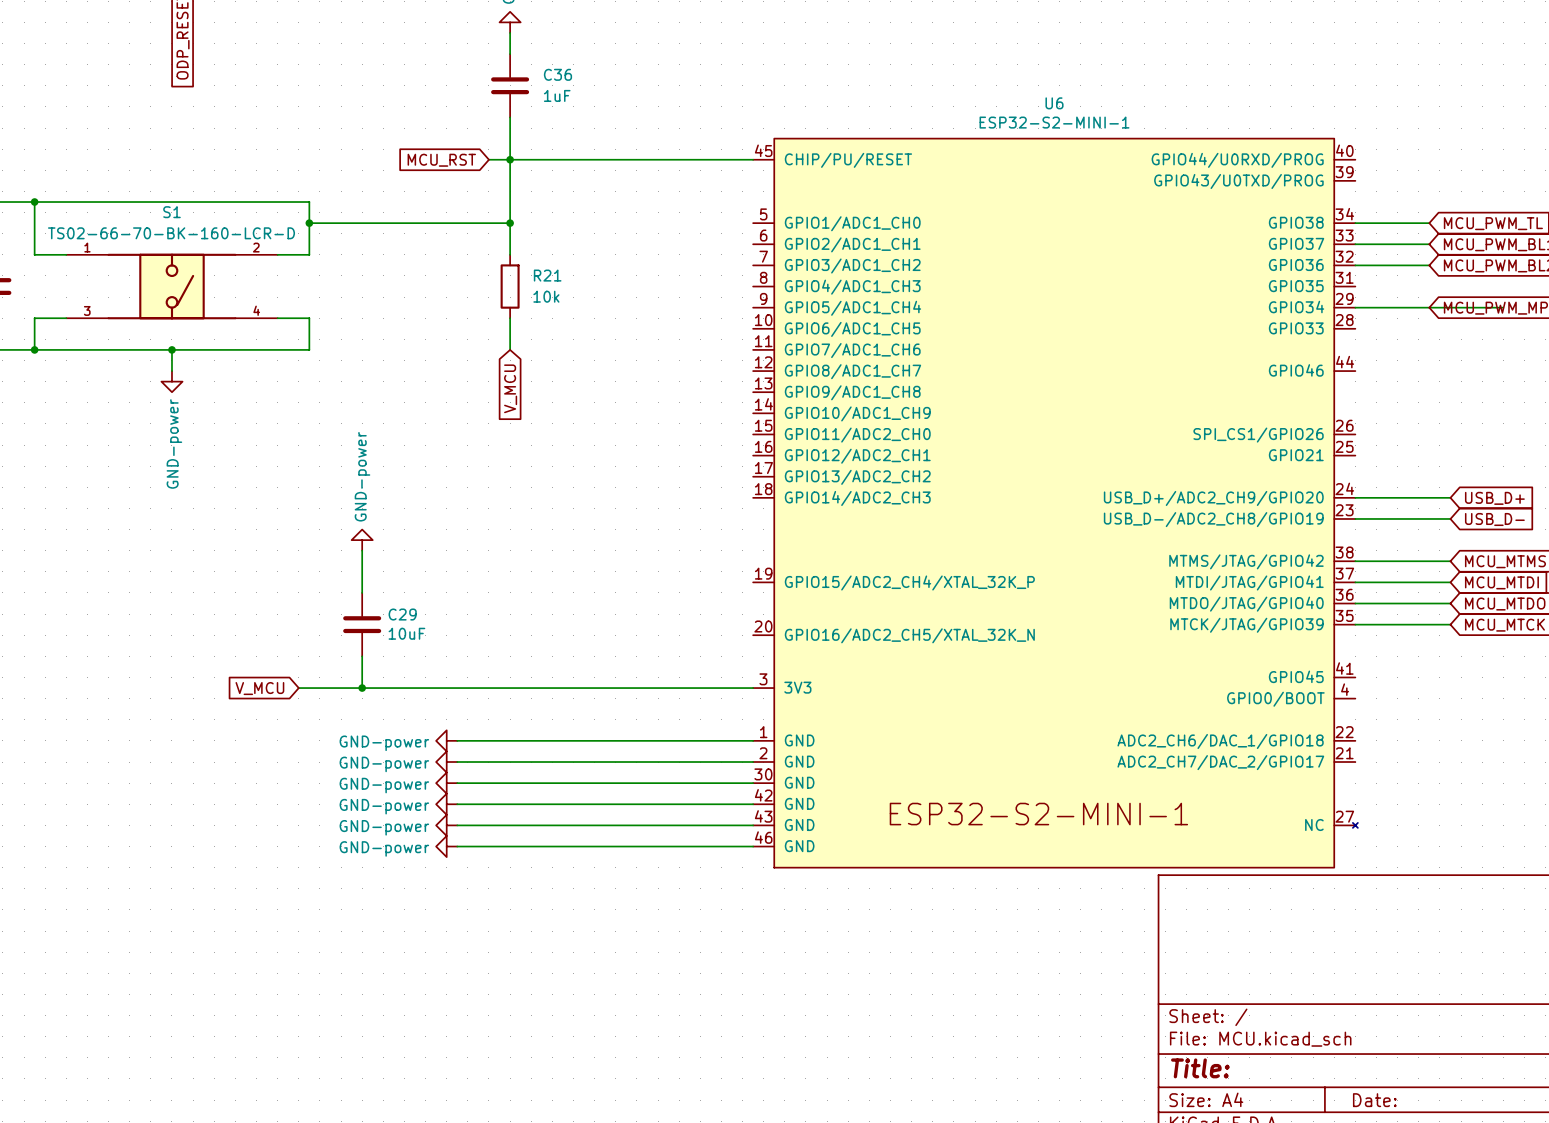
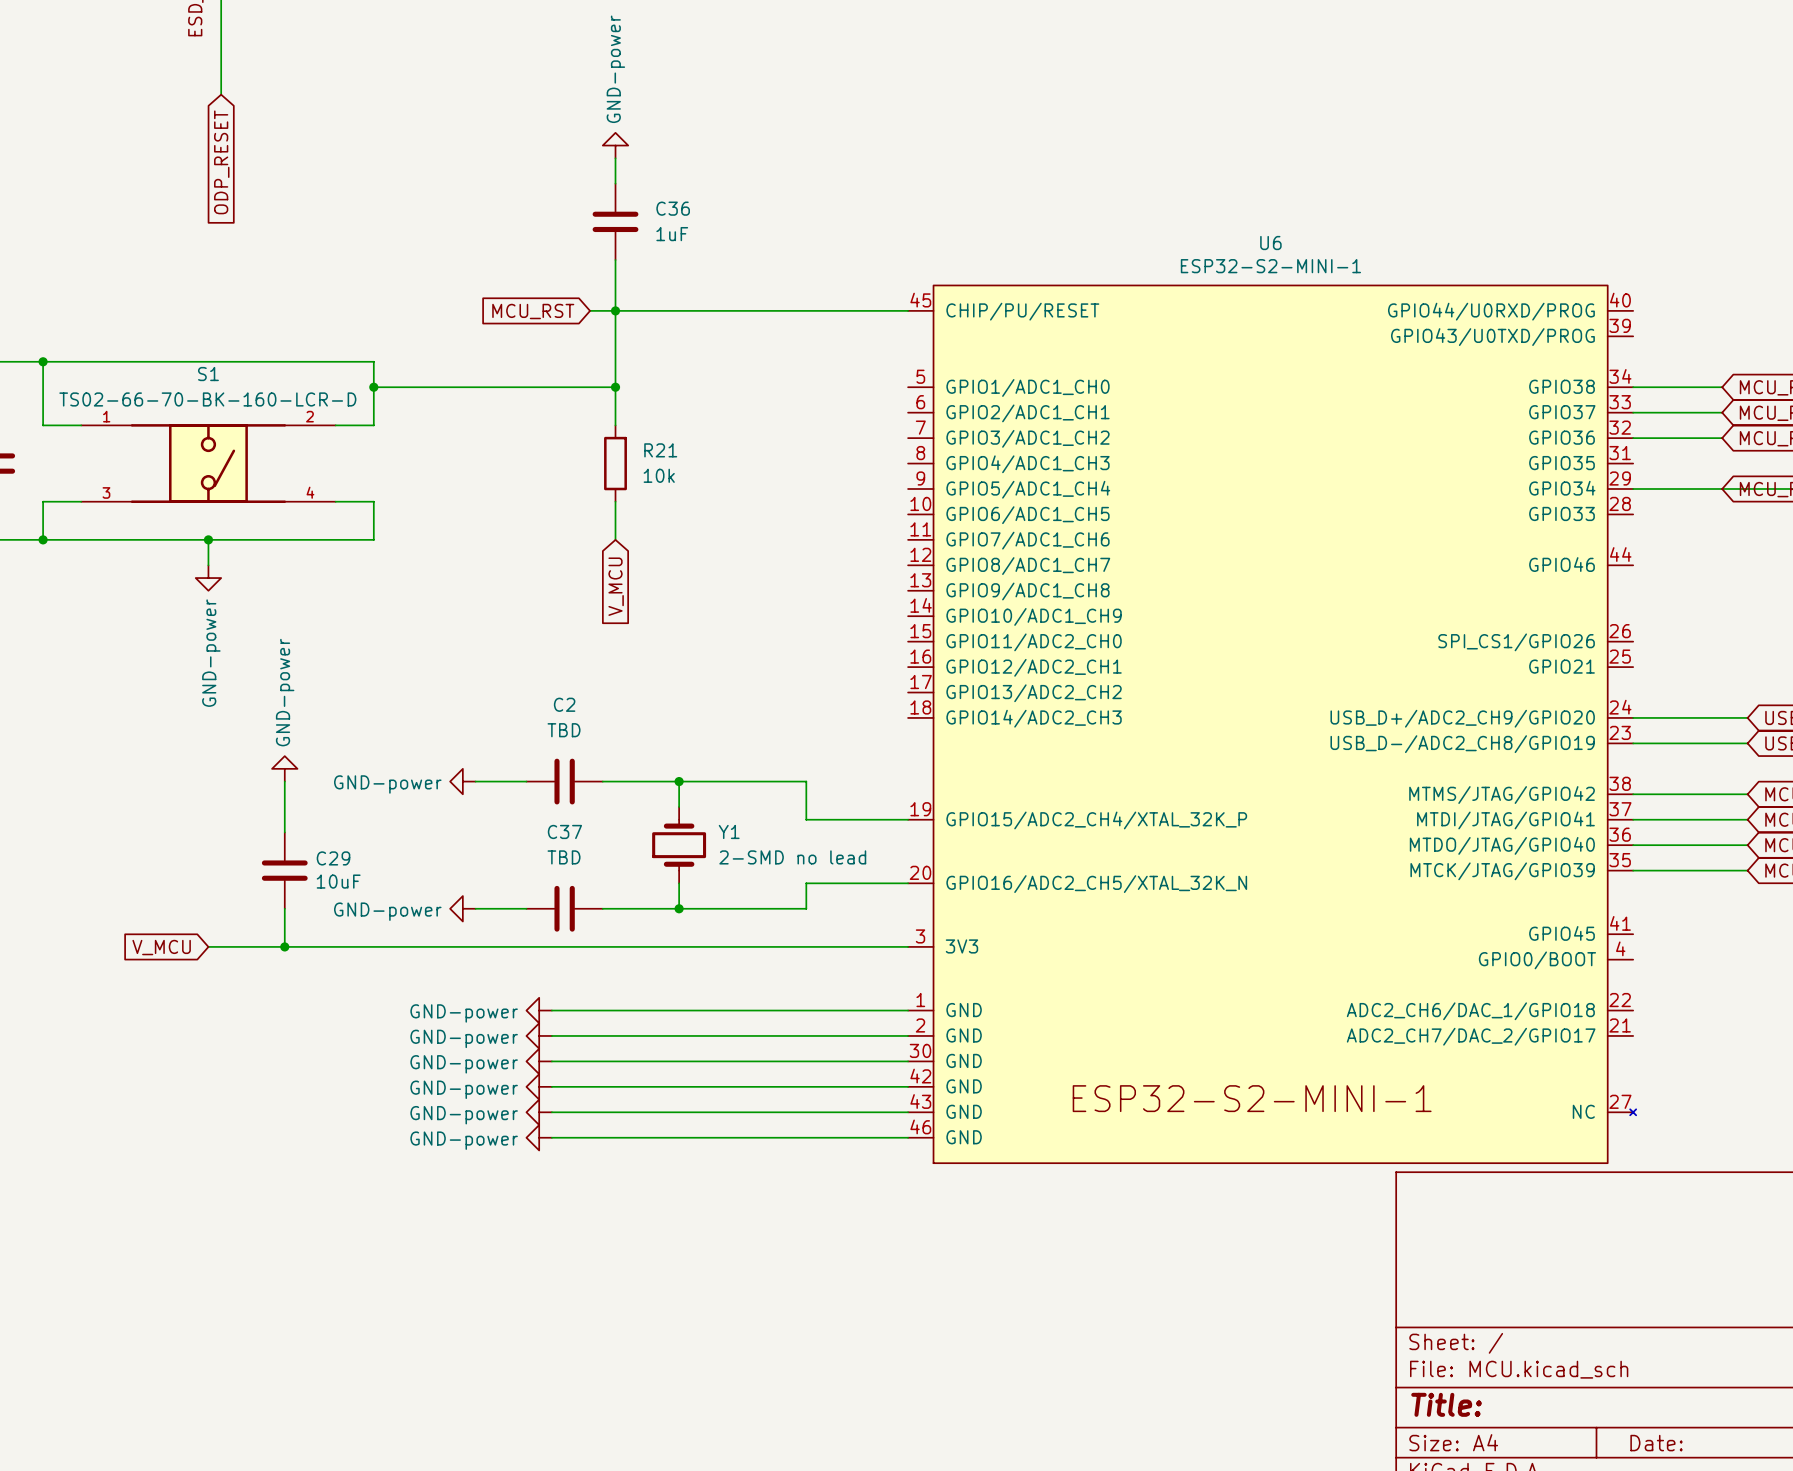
power symbol: none -> GND-power (284, 768)
power symbol rotation: 0° (362, 540) -> 90° counterclockwise (462, 781)
power symbol position: GND-power (362, 540) -> GND-power (462, 781)
wire: (362, 550) (362, 592) -> (284, 781) (284, 832)
wire: none -> (475, 781) (526, 781)
C2: none -> TBD (564, 781)
wire: none -> (602, 781) (806, 781) (806, 819) (908, 819)
wire: none -> (679, 781) (679, 807)
junction: none -> (679, 781)
Y1: none -> 2-SMD no lead (679, 845)
C29 position: (362, 624) -> (284, 870)
wire: none -> (679, 883) (679, 908)
wire: none -> (908, 883) (806, 883) (806, 908) (602, 908)
wire: (362, 656) (362, 688) -> (284, 908) (284, 946)
power symbol: none -> GND-power (462, 908)
wire: none -> (475, 908) (526, 908)
C37: none -> TBD (564, 908)
junction: none -> (679, 908)
wire: none -> (208, 946) (361, 946)
junction: none -> (284, 946)
global label position: V_MCU (259, 688) -> V_MCU (161, 947)
junction: (362, 688) -> none

